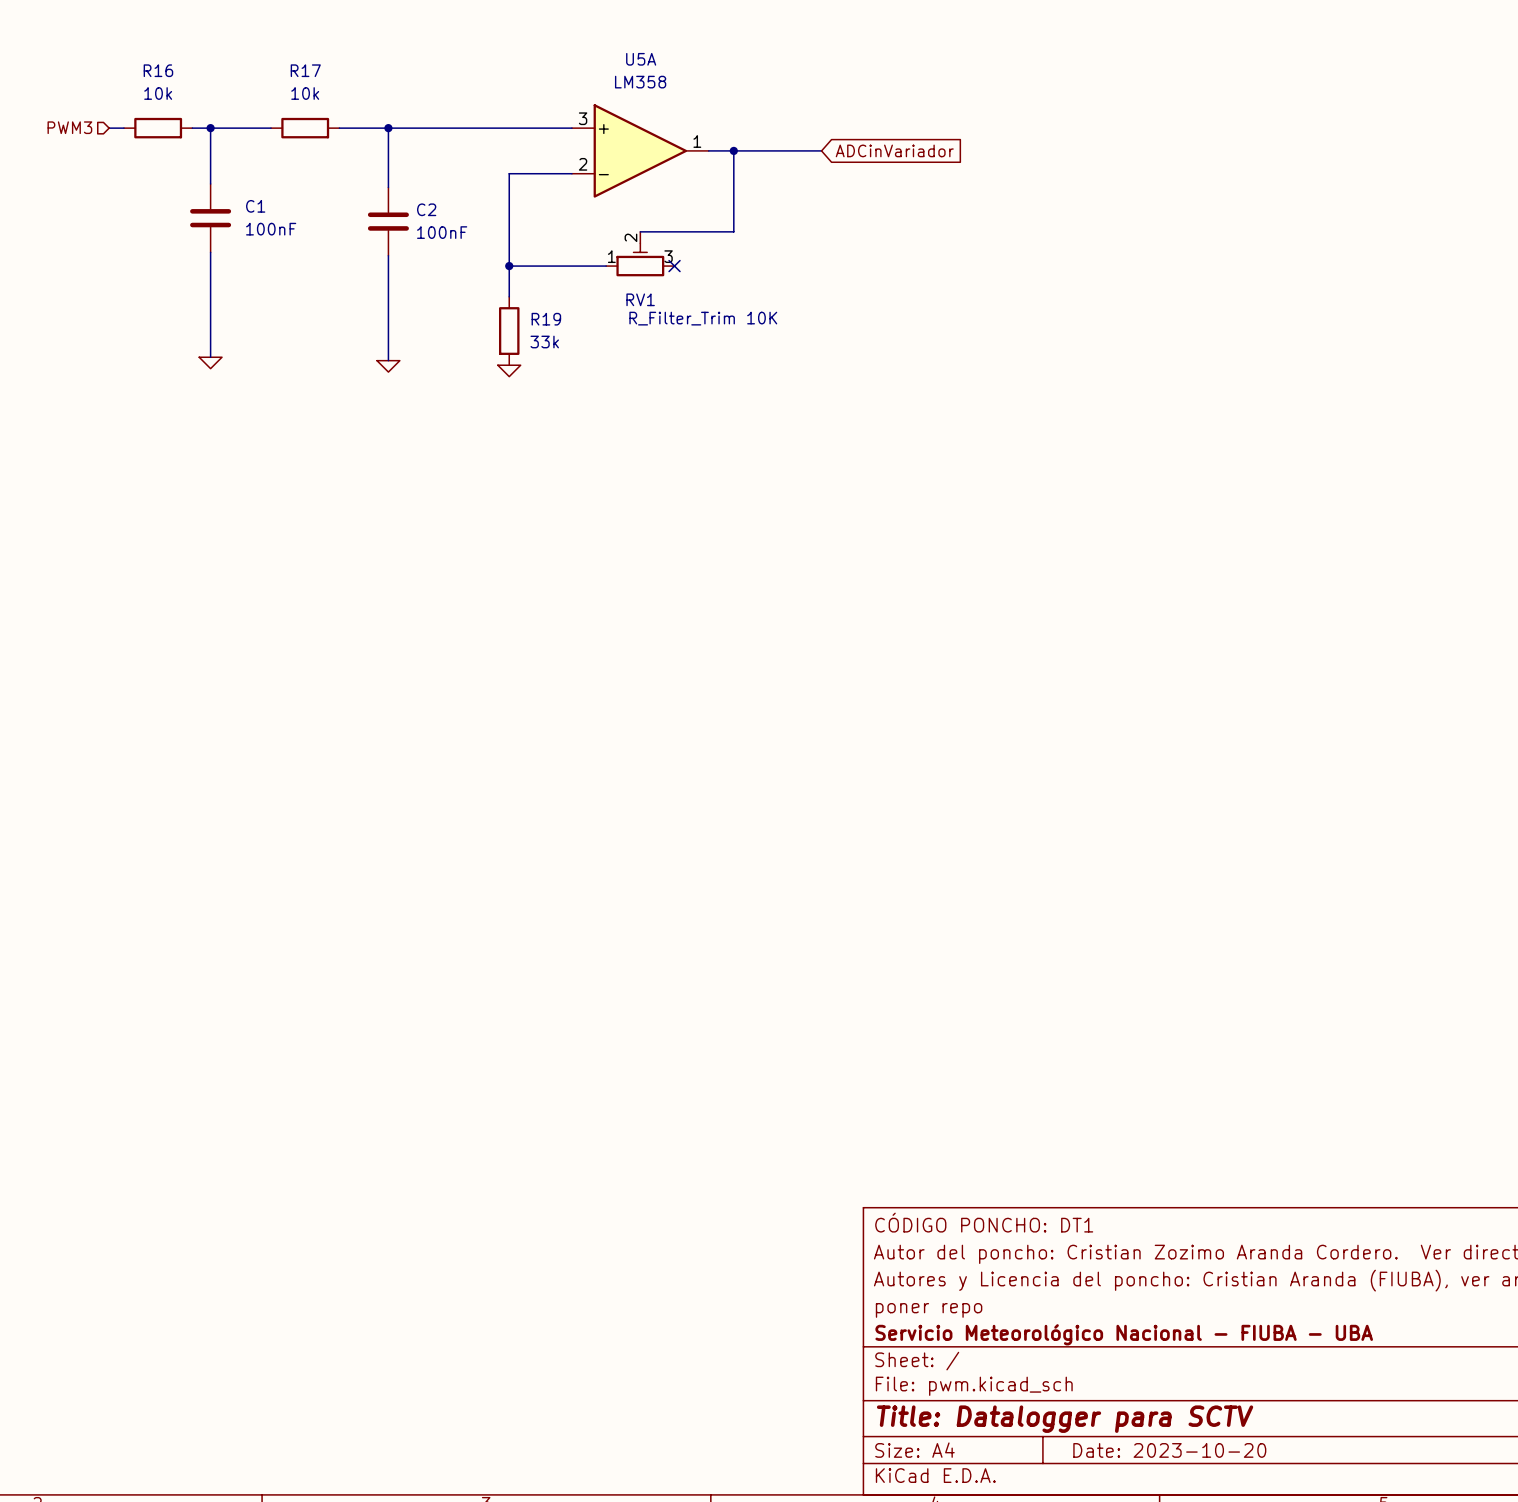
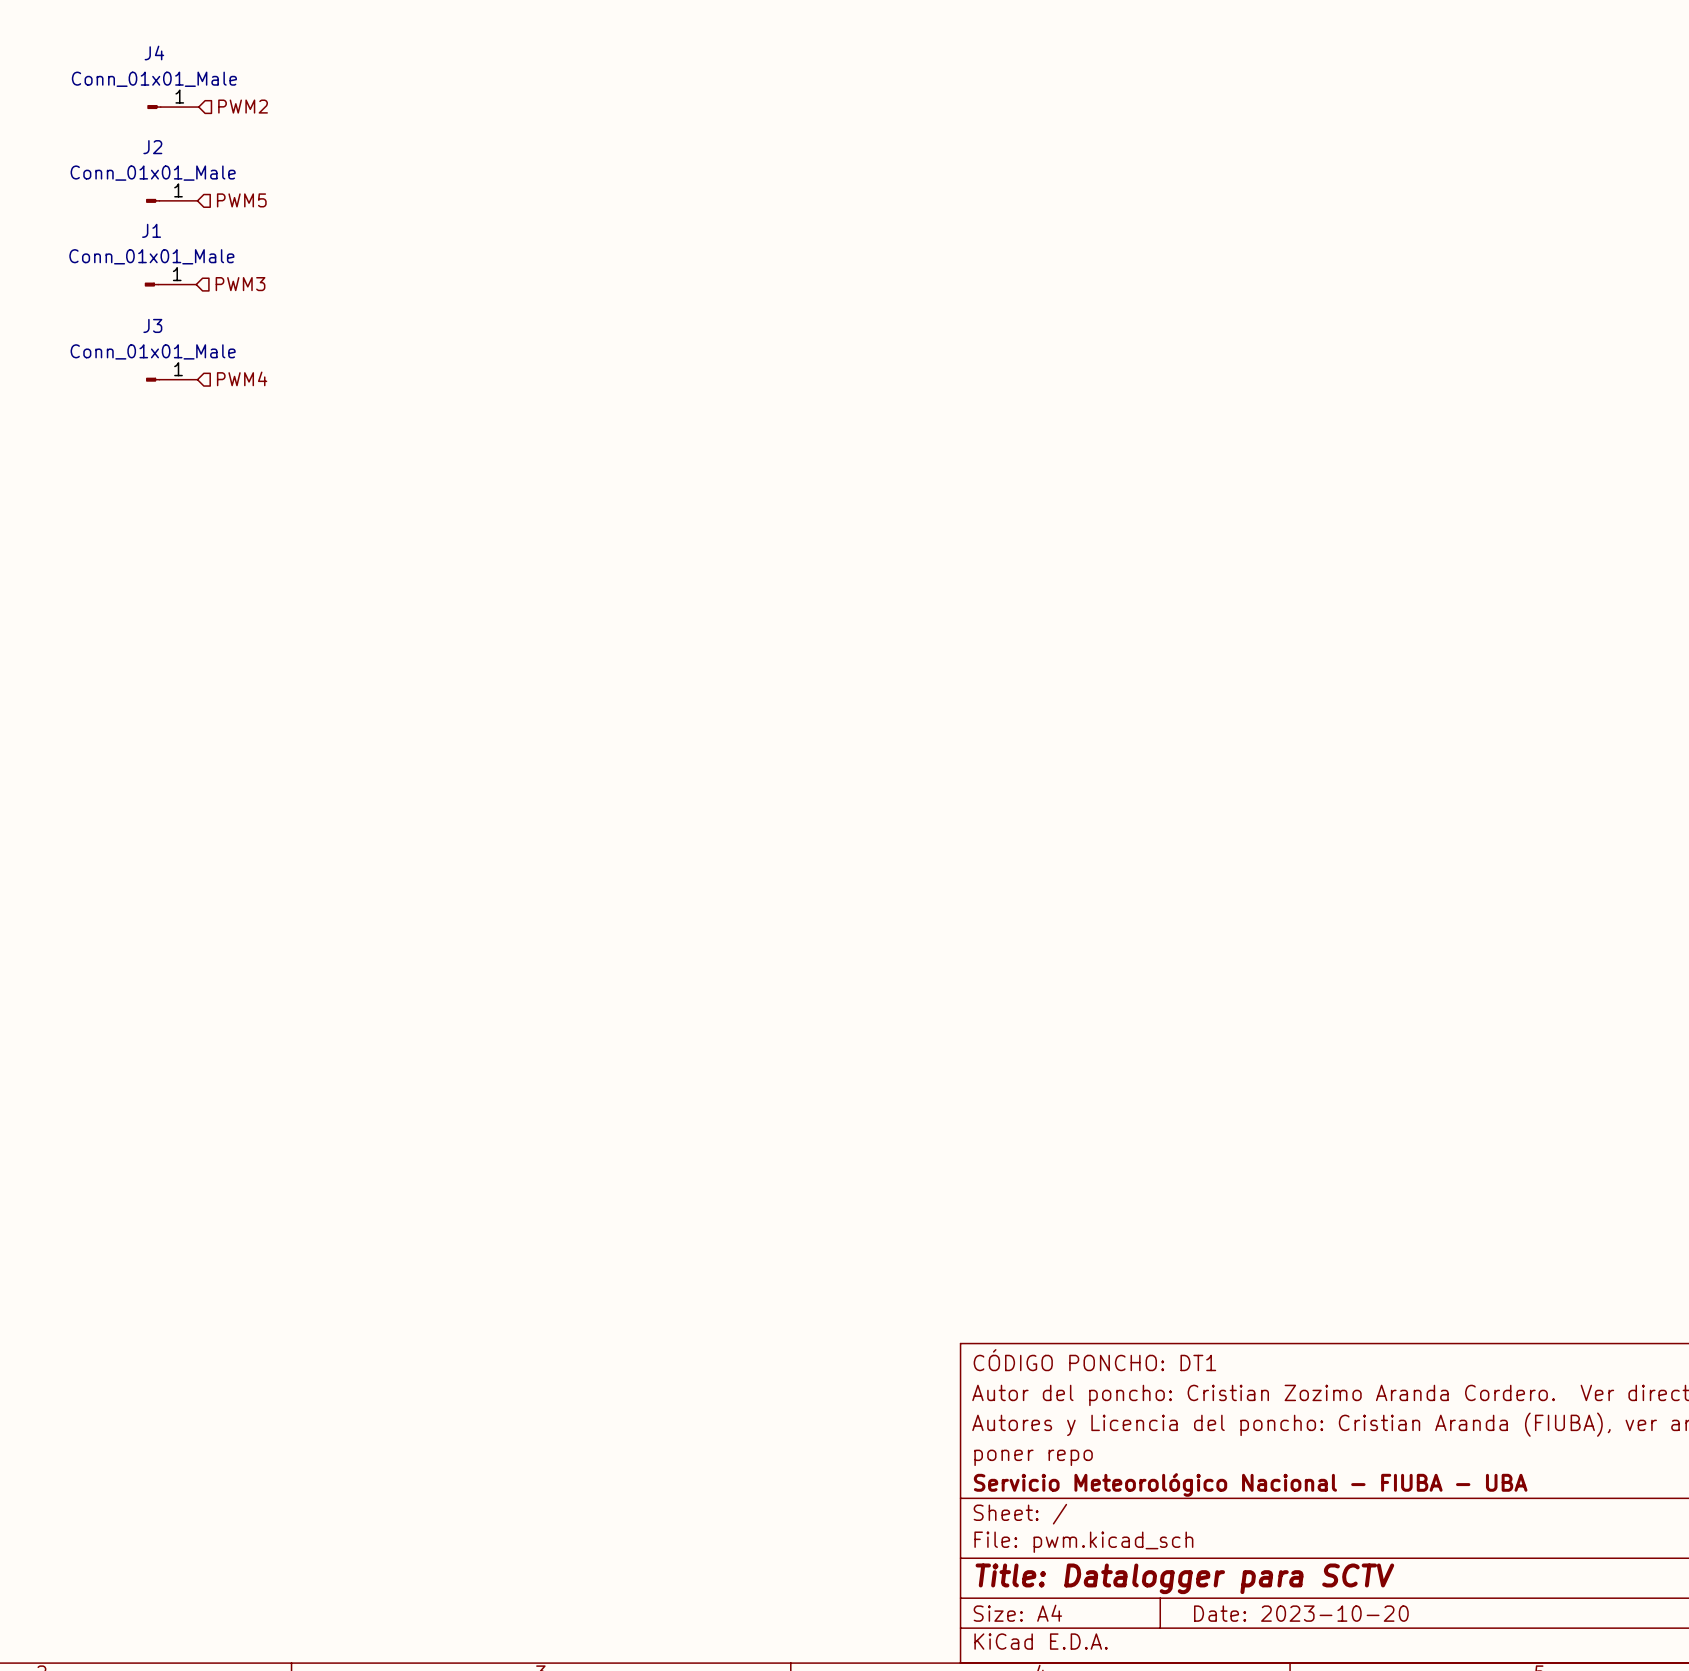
hierarchical label: none -> PWM2 (243, 106)
J4: none -> Conn_01x01_Male (173, 107)
hierarchical label rotation: 0° (69, 127) -> 180° (240, 284)
hierarchical label position: PWM3 (69, 127) -> PWM3 (240, 284)
wire: (109, 128) (123, 128) -> none
R16: 10k (158, 128) -> none
wire: (192, 128) (271, 128) -> none
wire: (210, 128) (210, 183) -> none
junction: (210, 128) -> none
R17: 10k (305, 128) -> none
wire: (339, 128) (571, 128) -> none
wire: (388, 128) (388, 187) -> none
junction: (388, 128) -> none
U5A: LM358 (640, 150) -> none
wire: (708, 150) (821, 150) -> none
wire: (733, 150) (733, 231) (640, 231) -> none
junction: (733, 150) -> none
global label: ADCinVariador (894, 150) -> none
wire: (571, 173) (509, 173) (509, 296) -> none
J2: none -> Conn_01x01_Male (171, 200)
hierarchical label: none -> PWM5 (241, 200)
C1: 100nF (210, 218) -> none
C2: 100nF (388, 221) -> none
wire: (210, 252) (210, 357) -> none
RV1: R_Filter_Trim 10K (640, 254) -> none
J1: none -> Conn_01x01_Male (170, 284)
wire: (388, 255) (388, 360) -> none
wire: (509, 266) (606, 266) -> none
junction: (509, 266) -> none
no-connect mark: (674, 266) -> none
R19: 33k (509, 331) -> none
hierarchical label: none -> PWM4 (242, 378)
J3: none -> Conn_01x01_Male (171, 379)
power symbol: (210, 362) -> none
power symbol: (388, 366) -> none
power symbol: (509, 370) -> none

